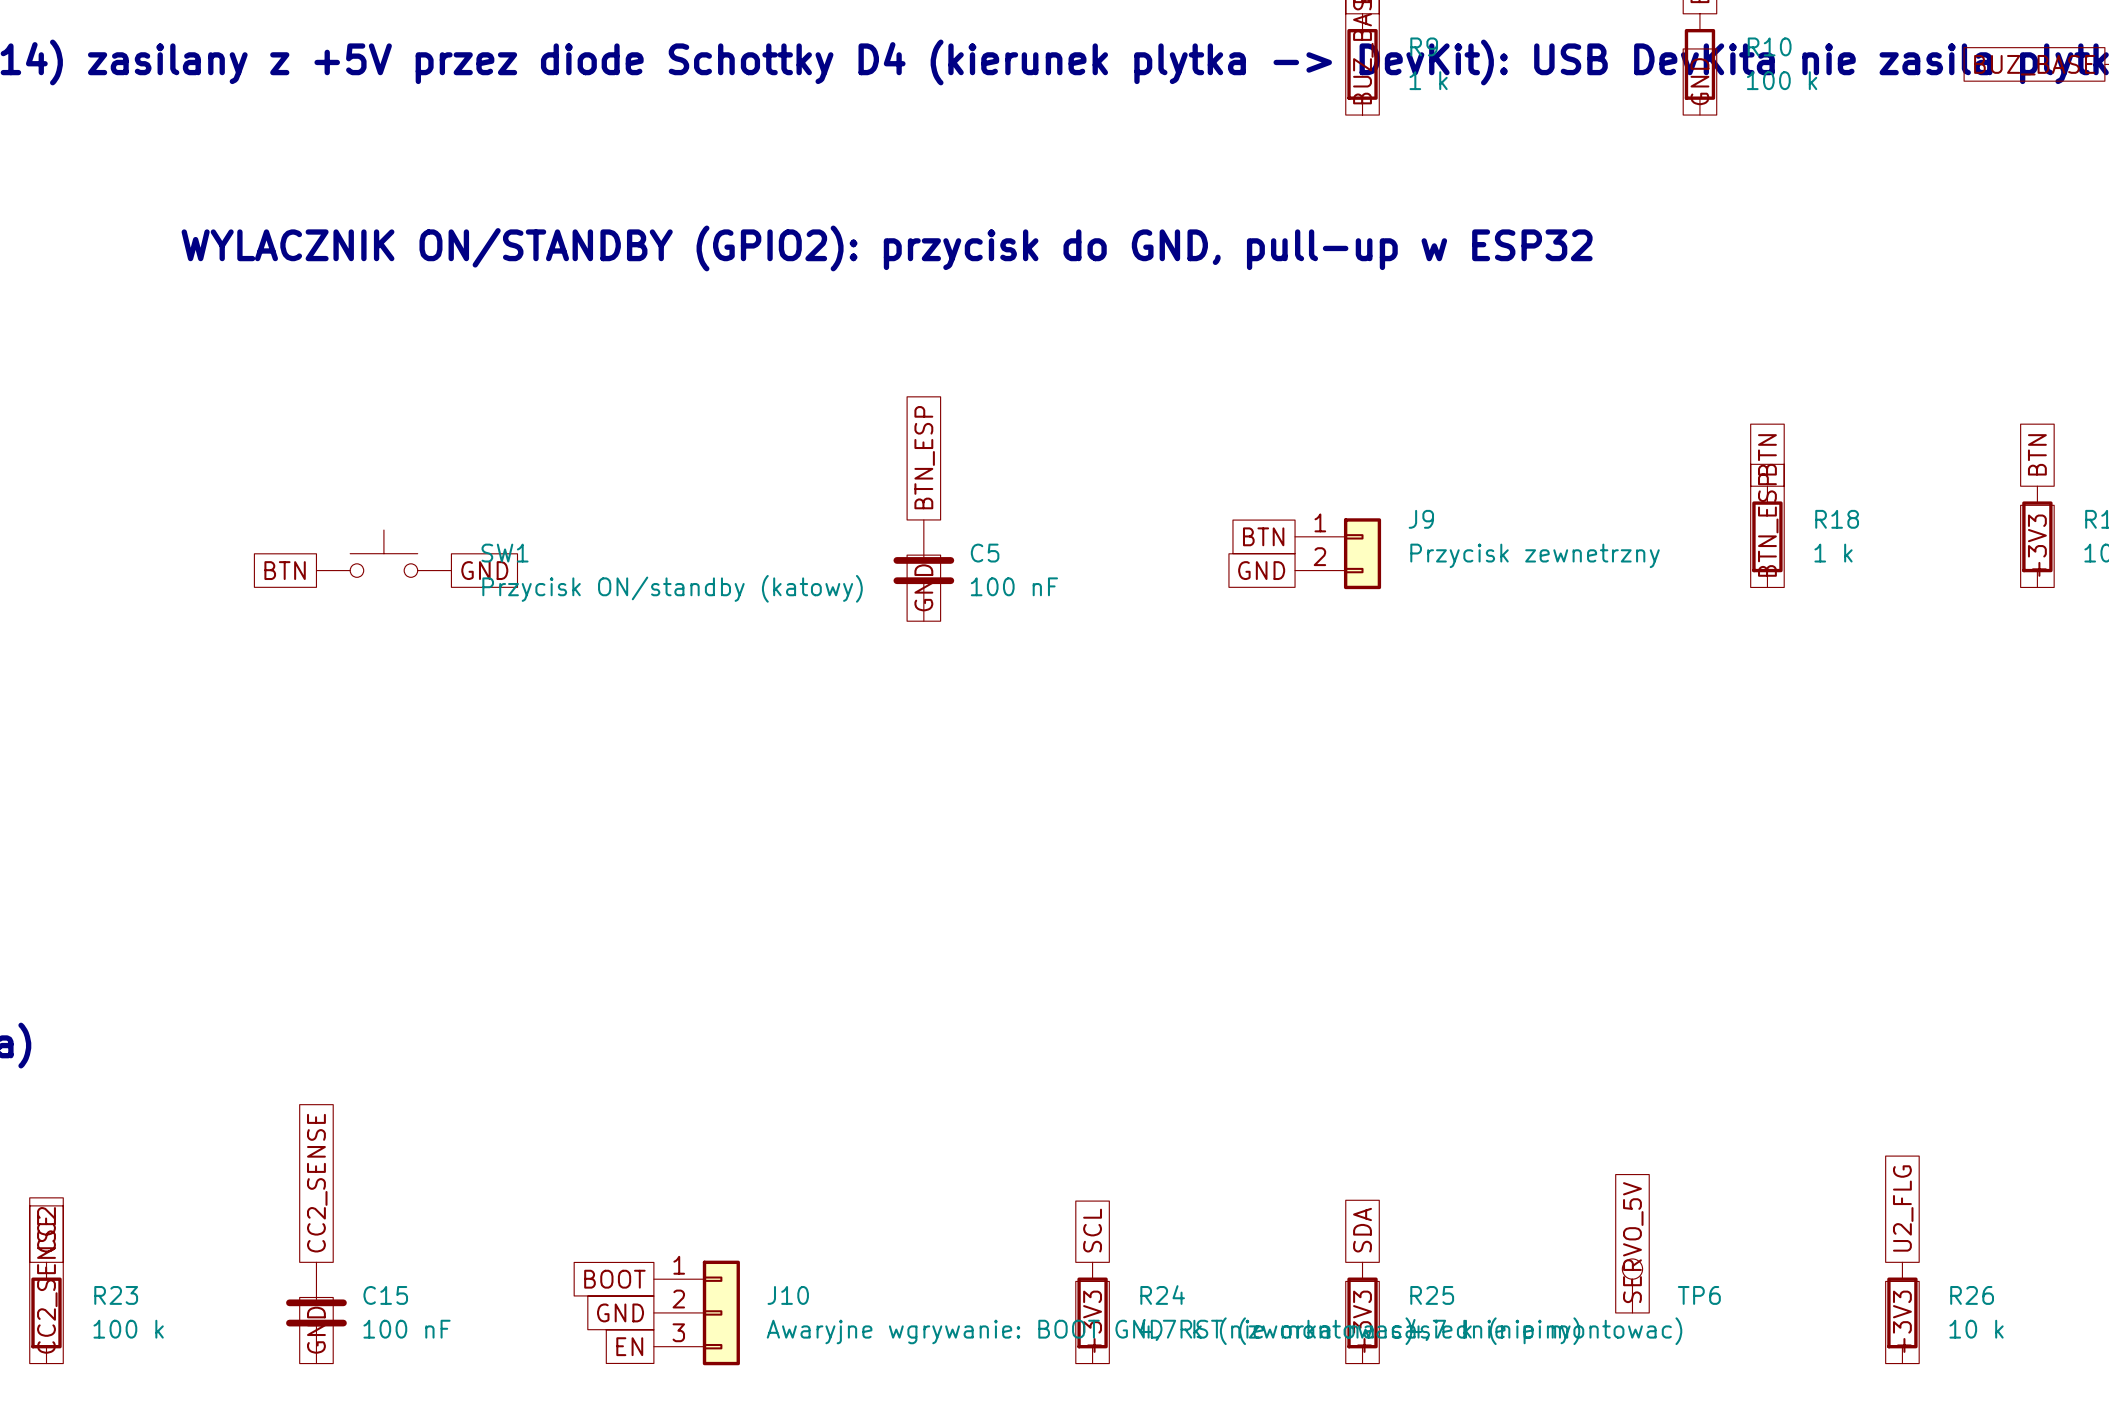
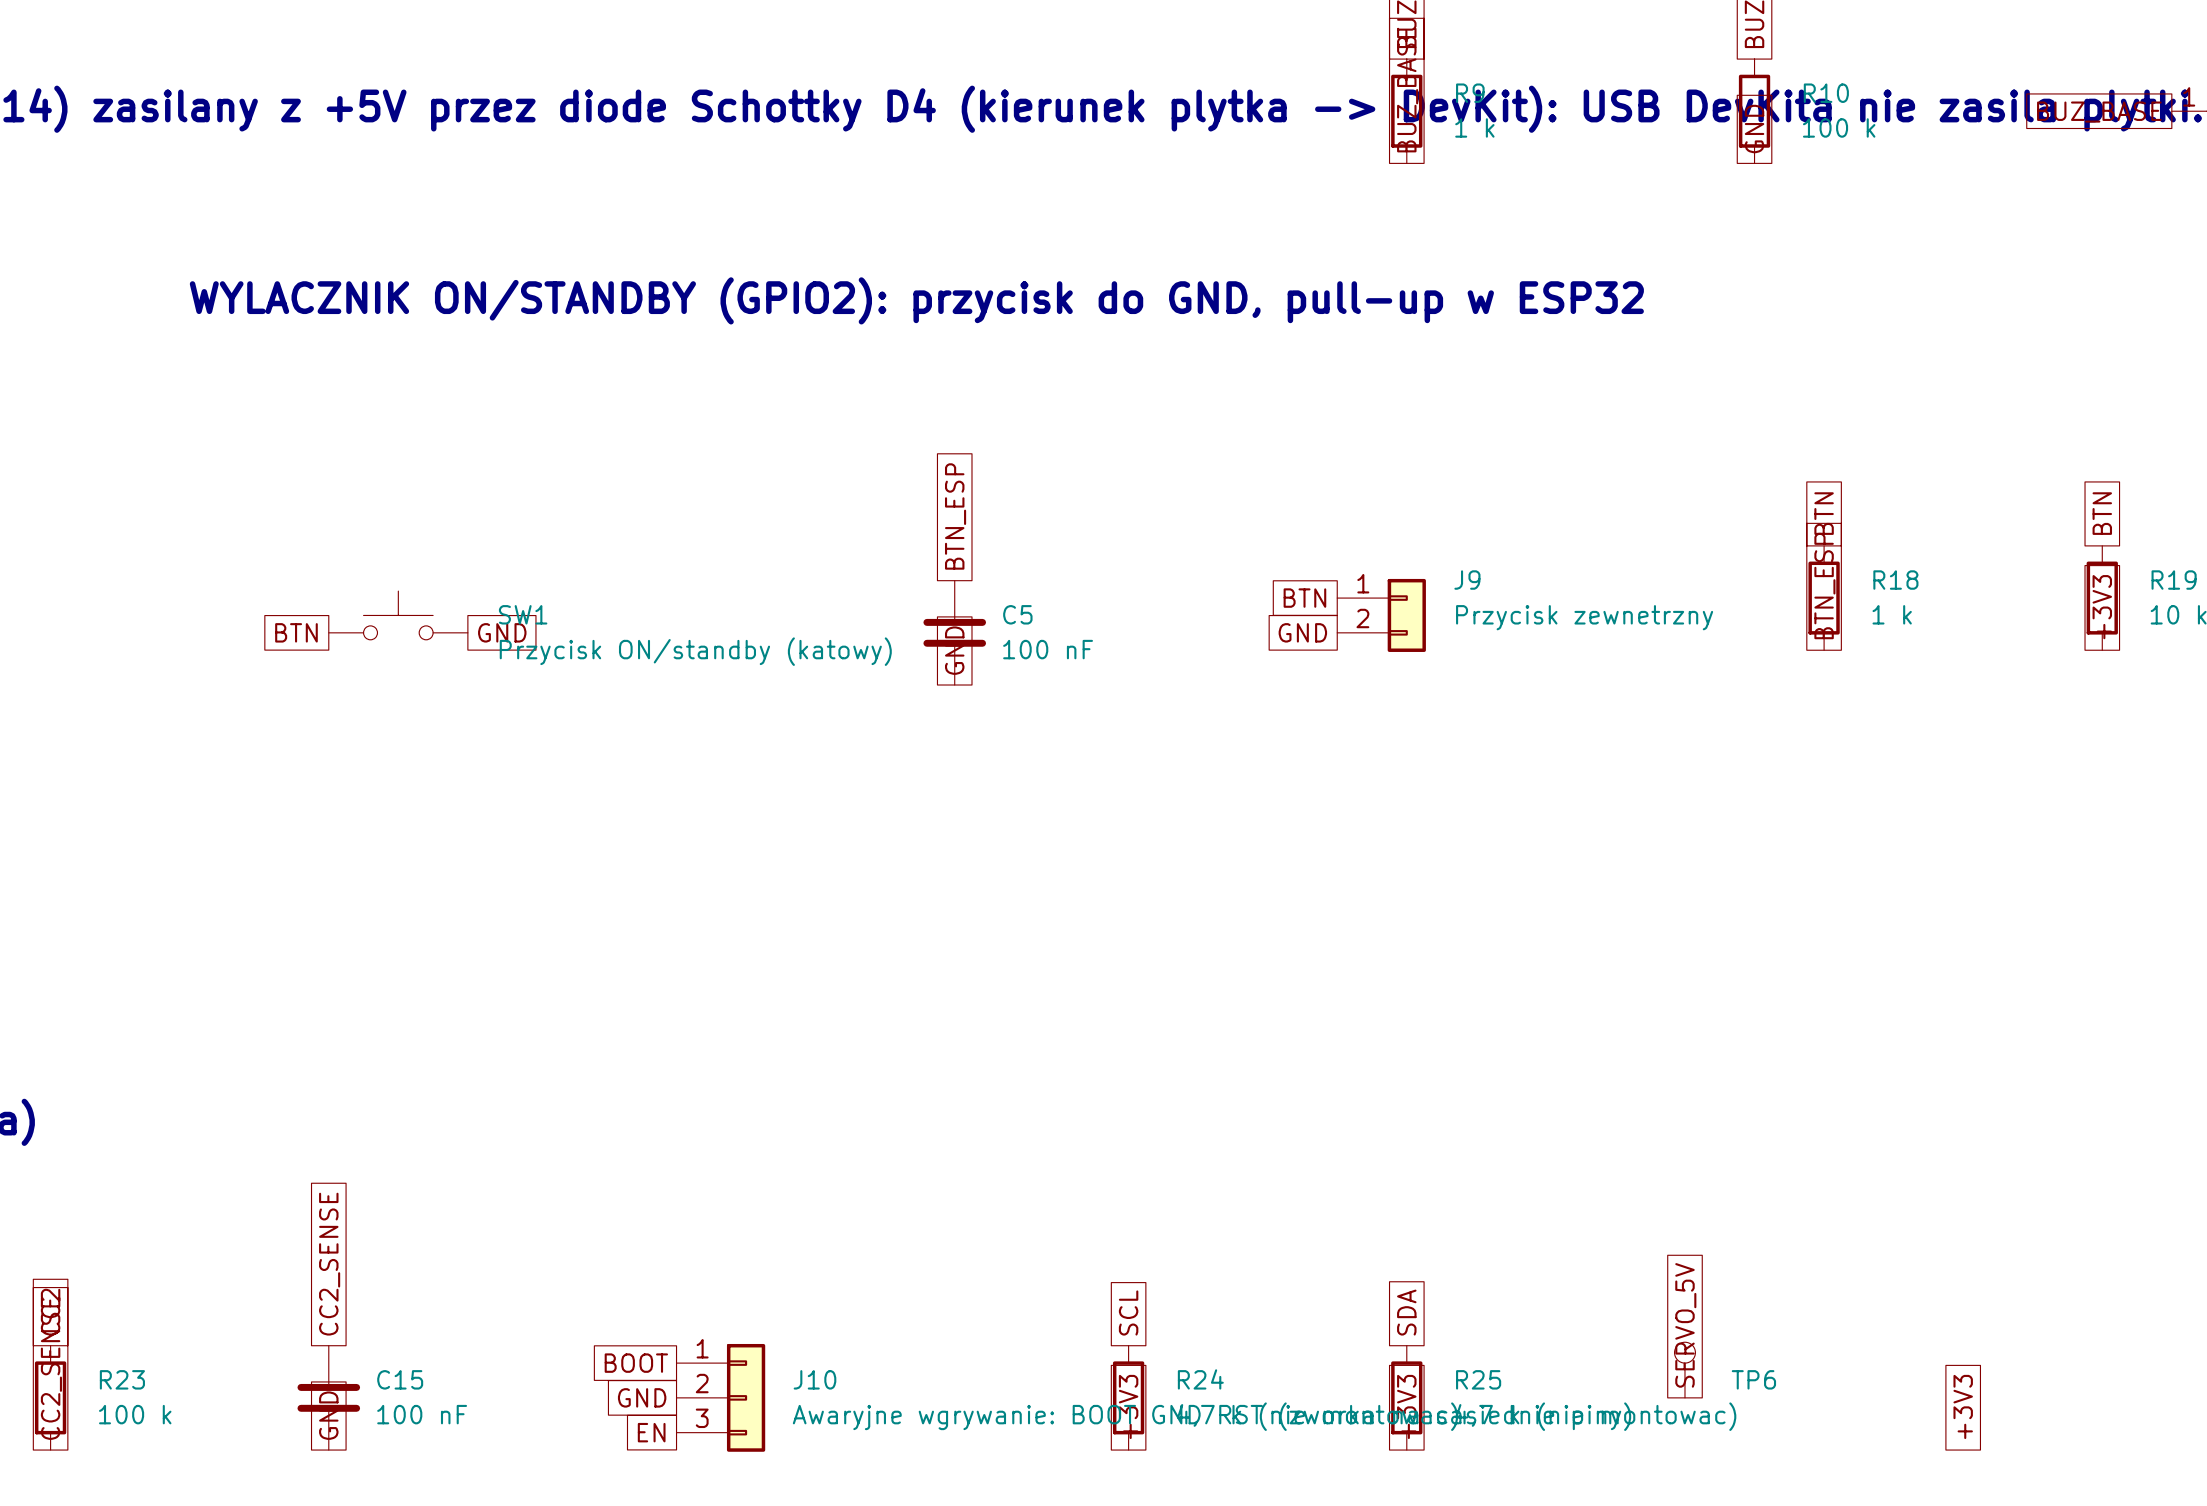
global label: U2_FLG (1903, 1208) -> none
R26: 10 k (1902, 1312) -> none

